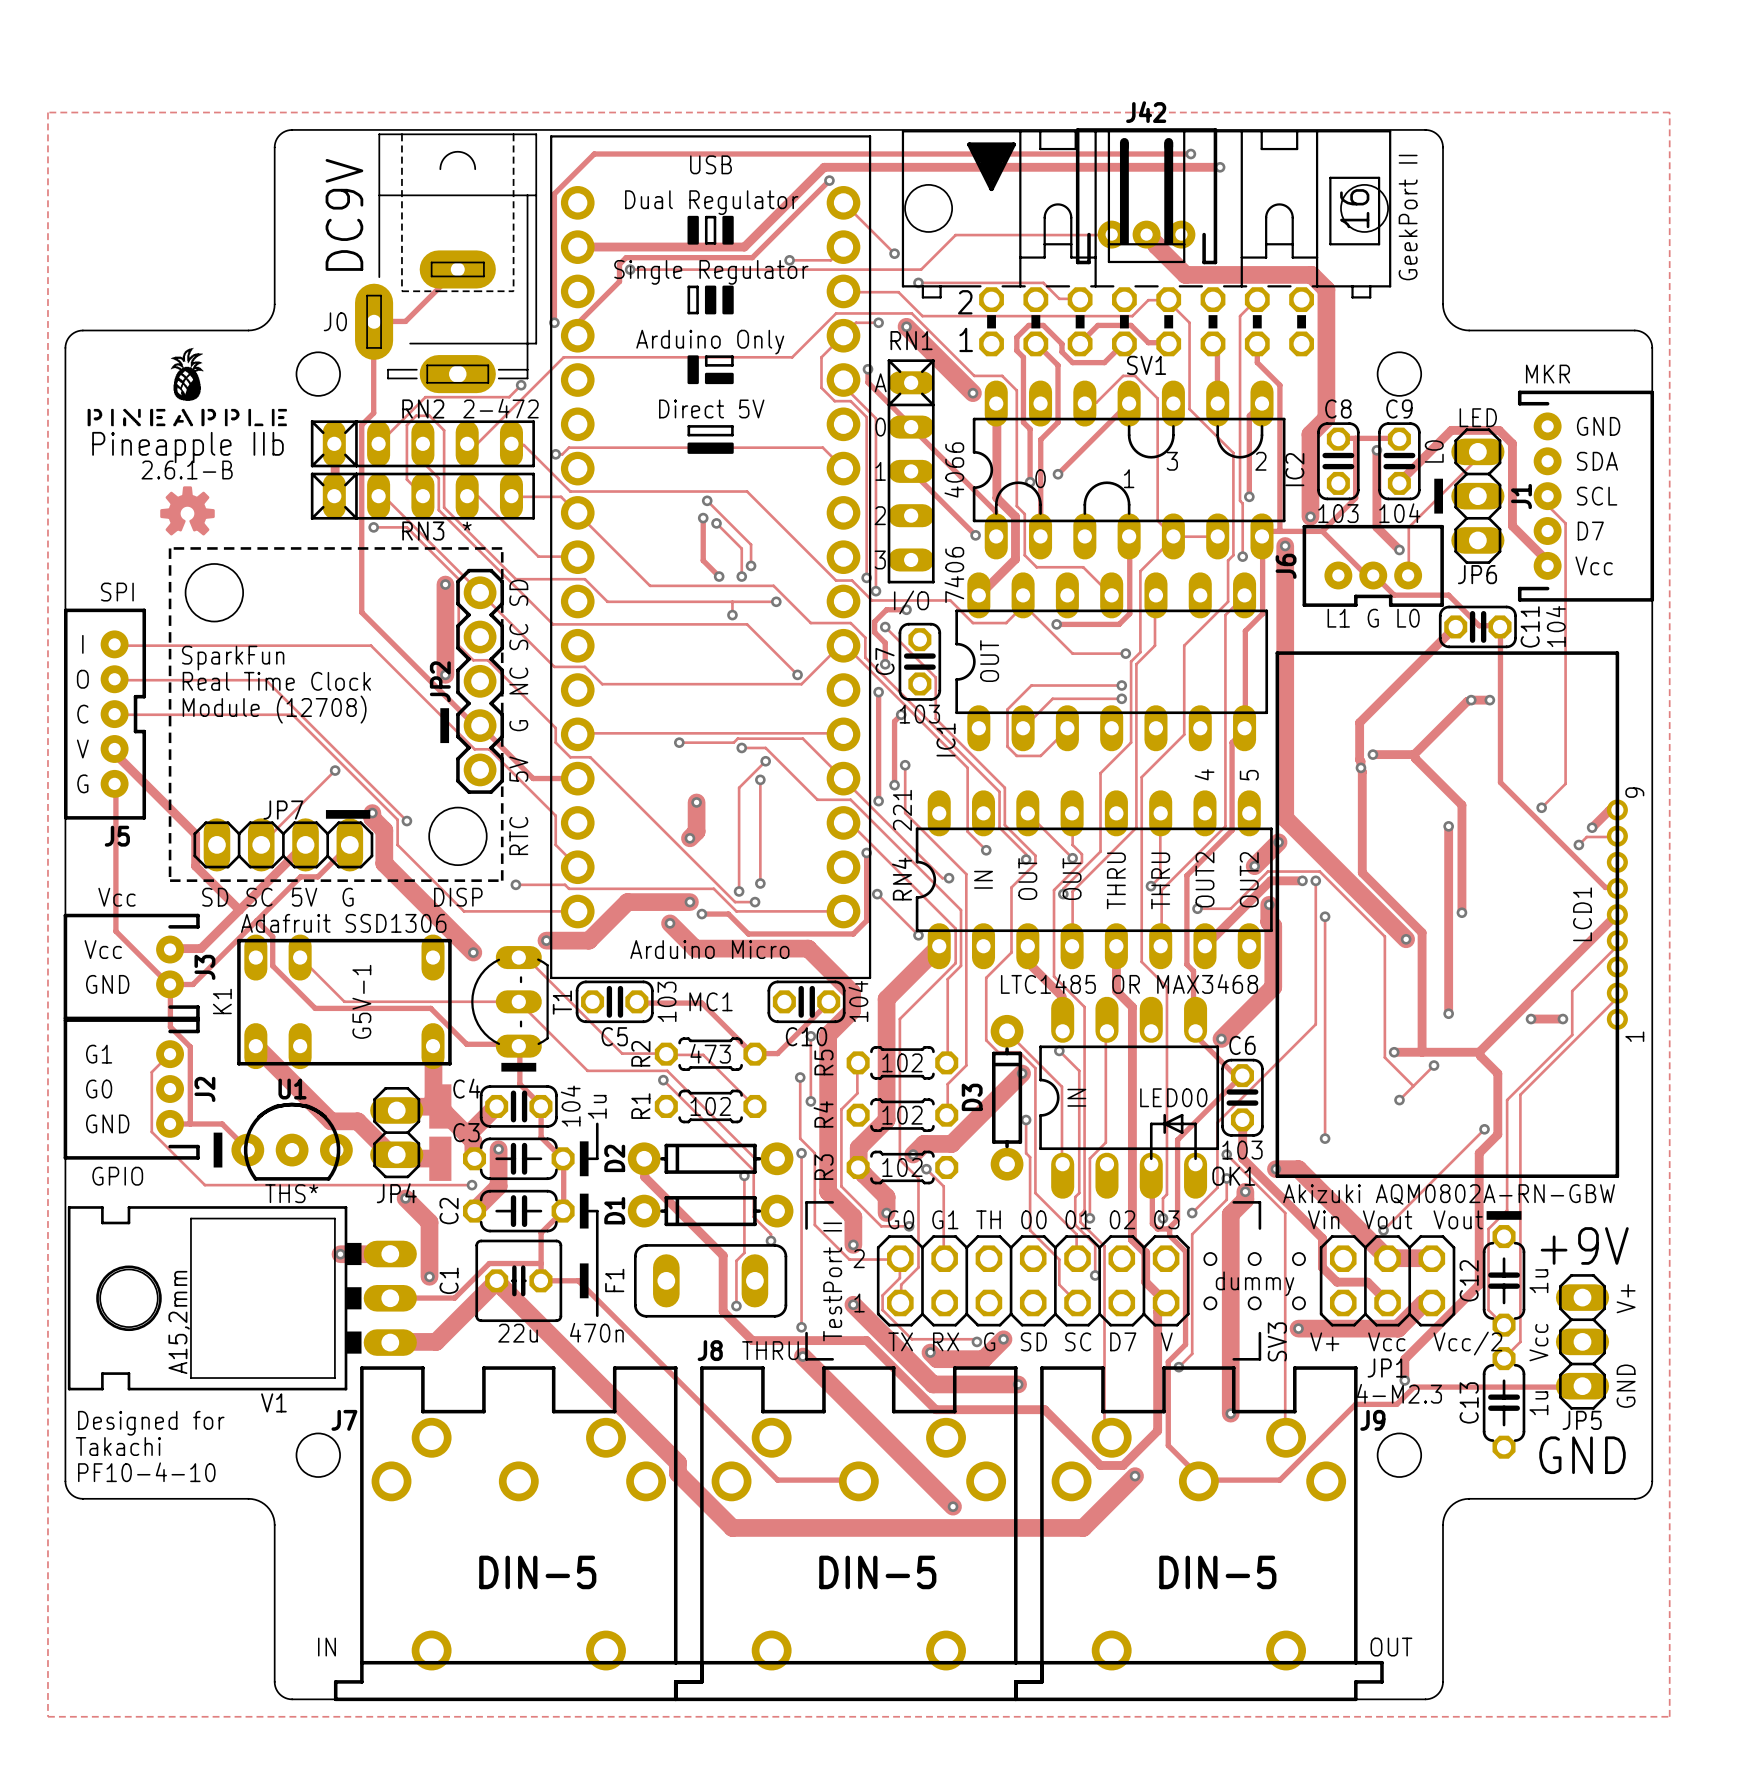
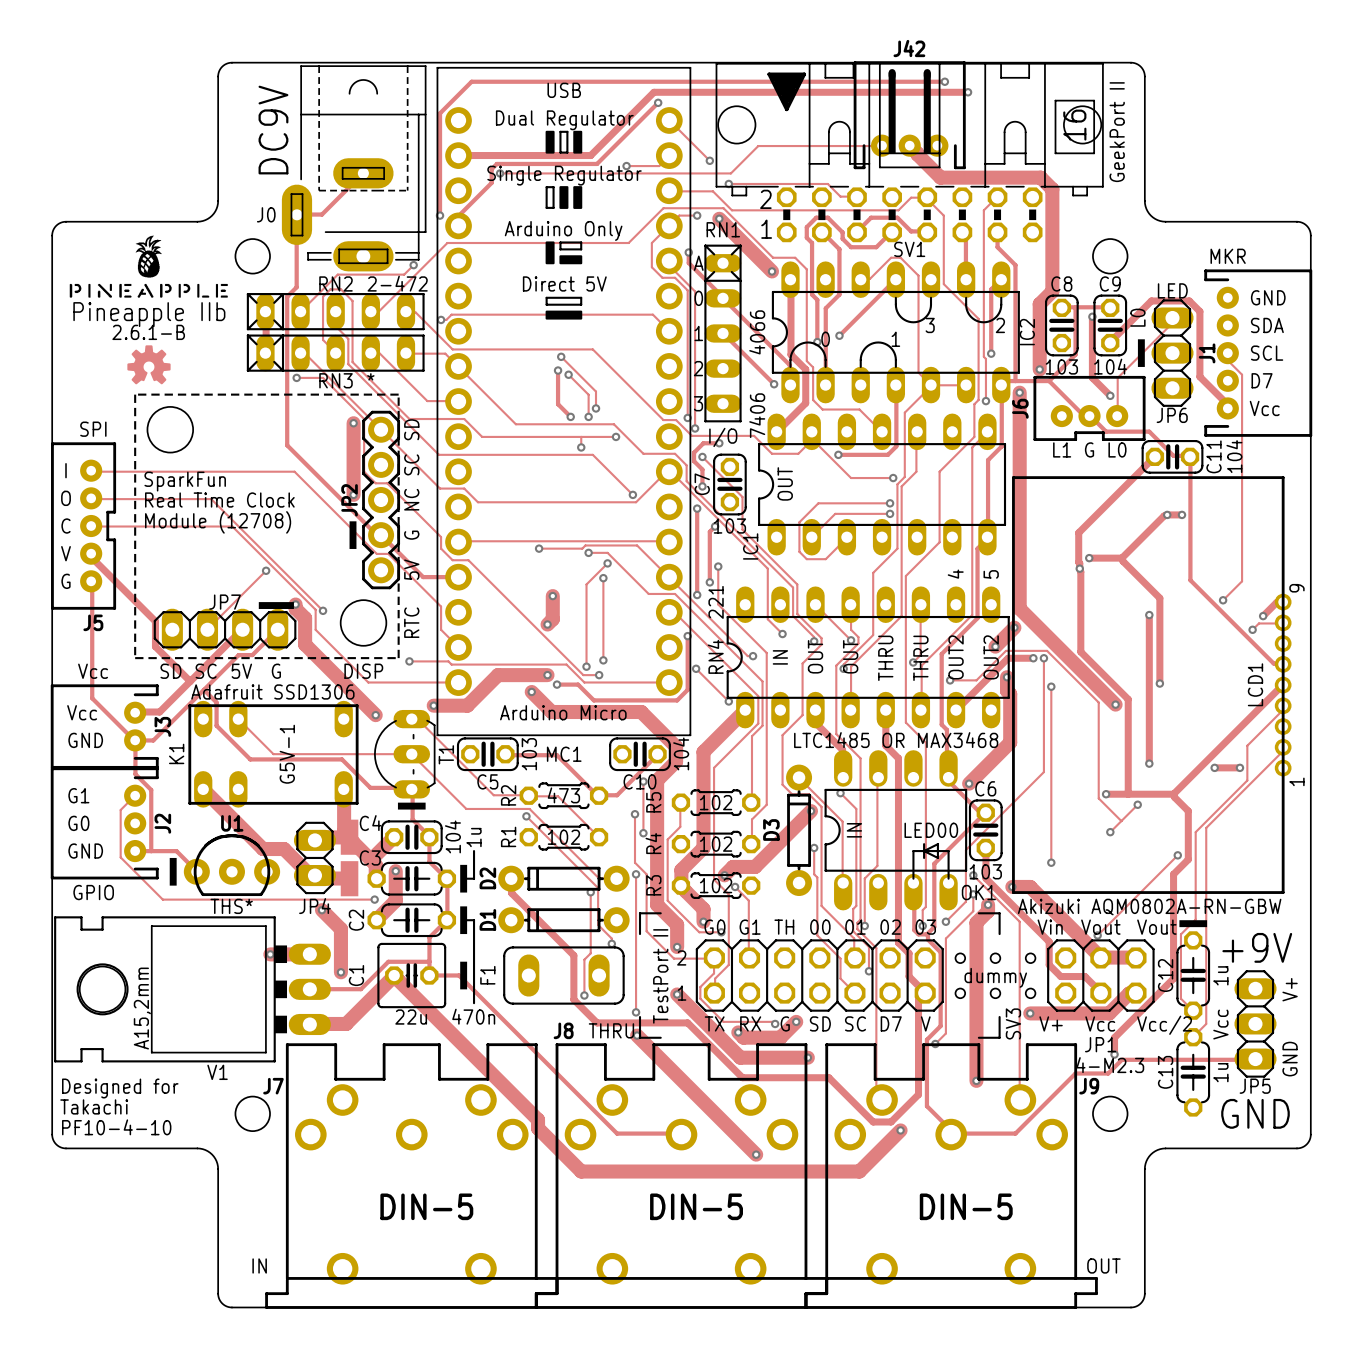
zone outline: (47, 112) (1669, 112) (1669, 1716) (47, 1716) (47, 112) -> none

